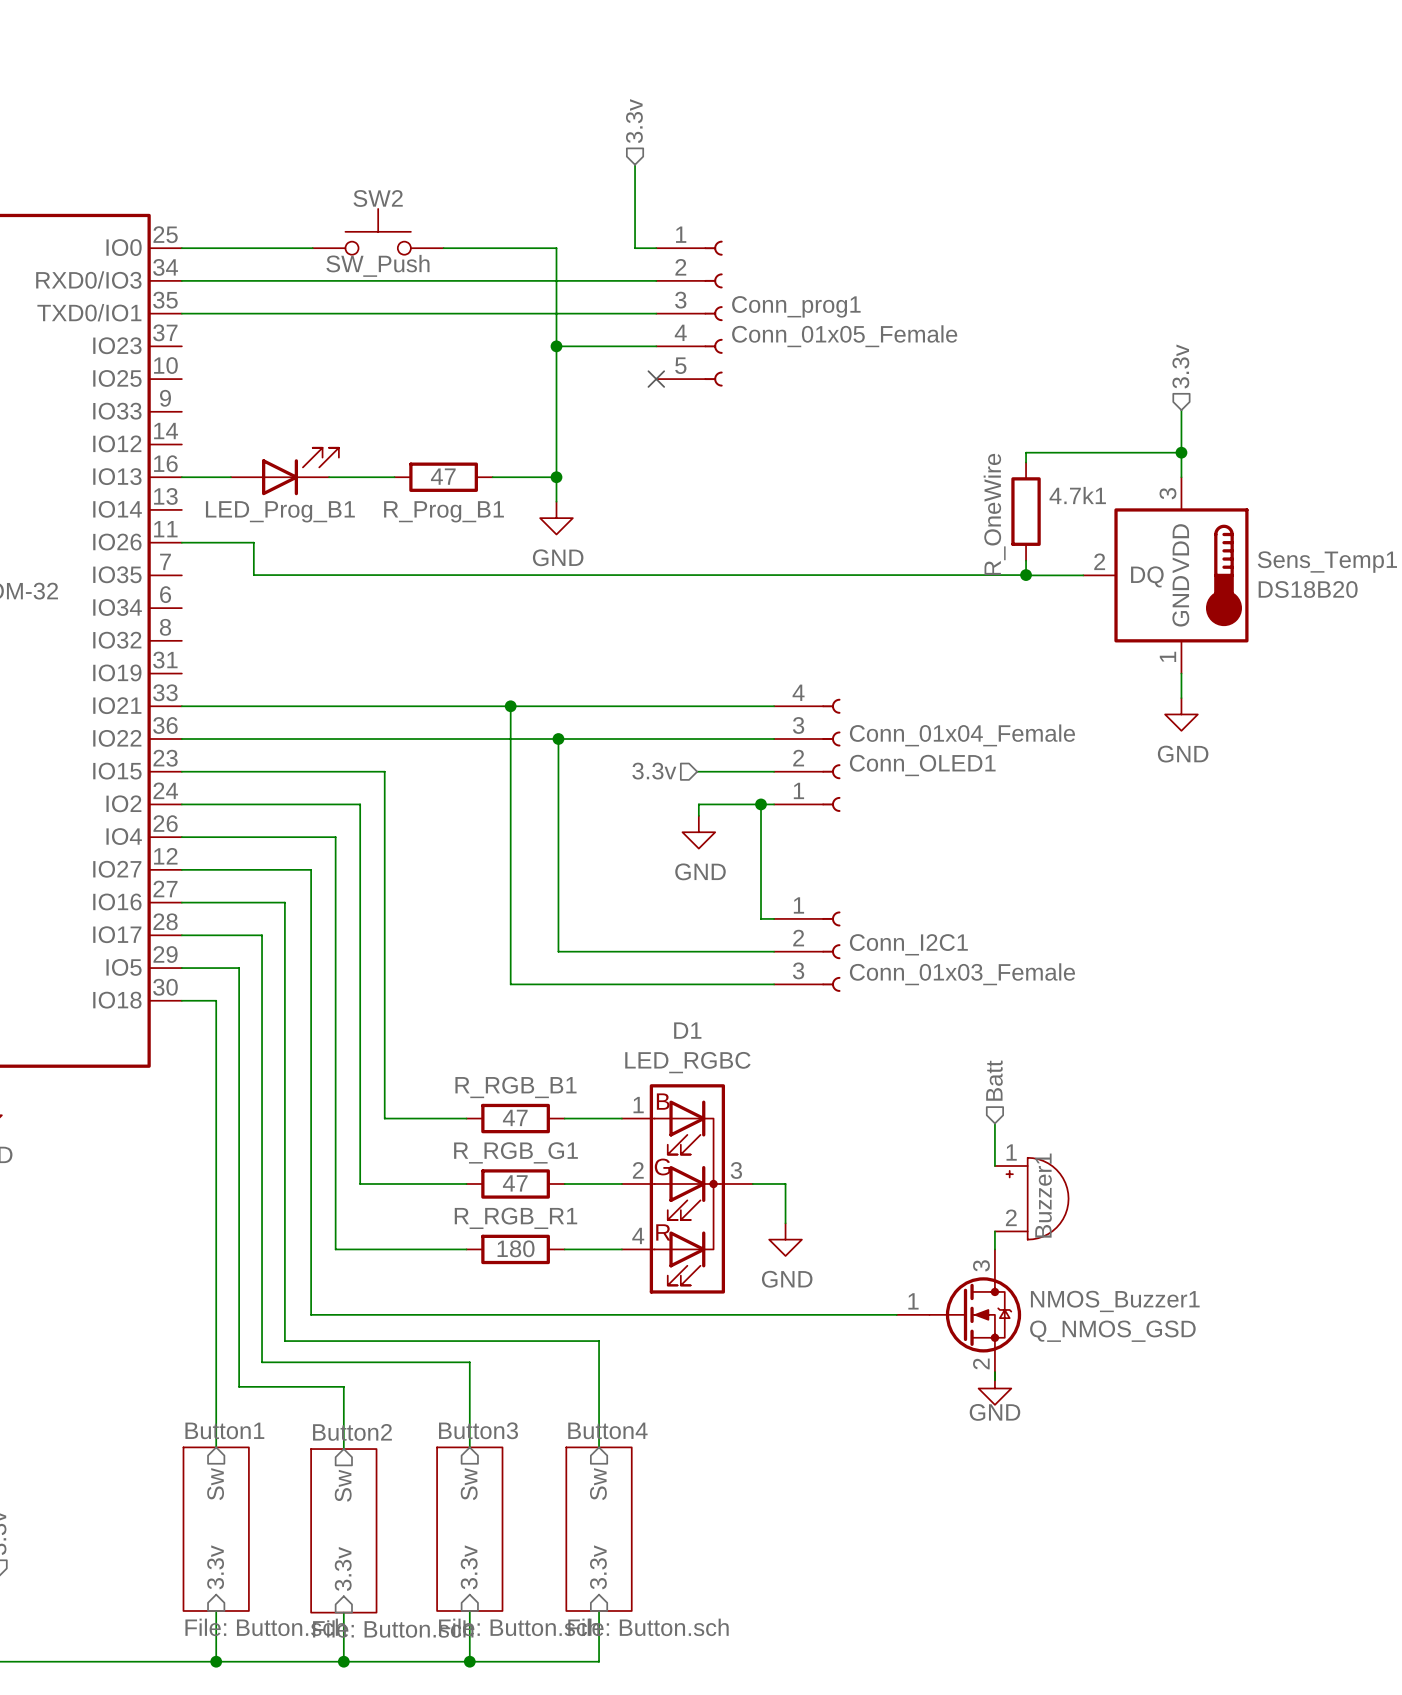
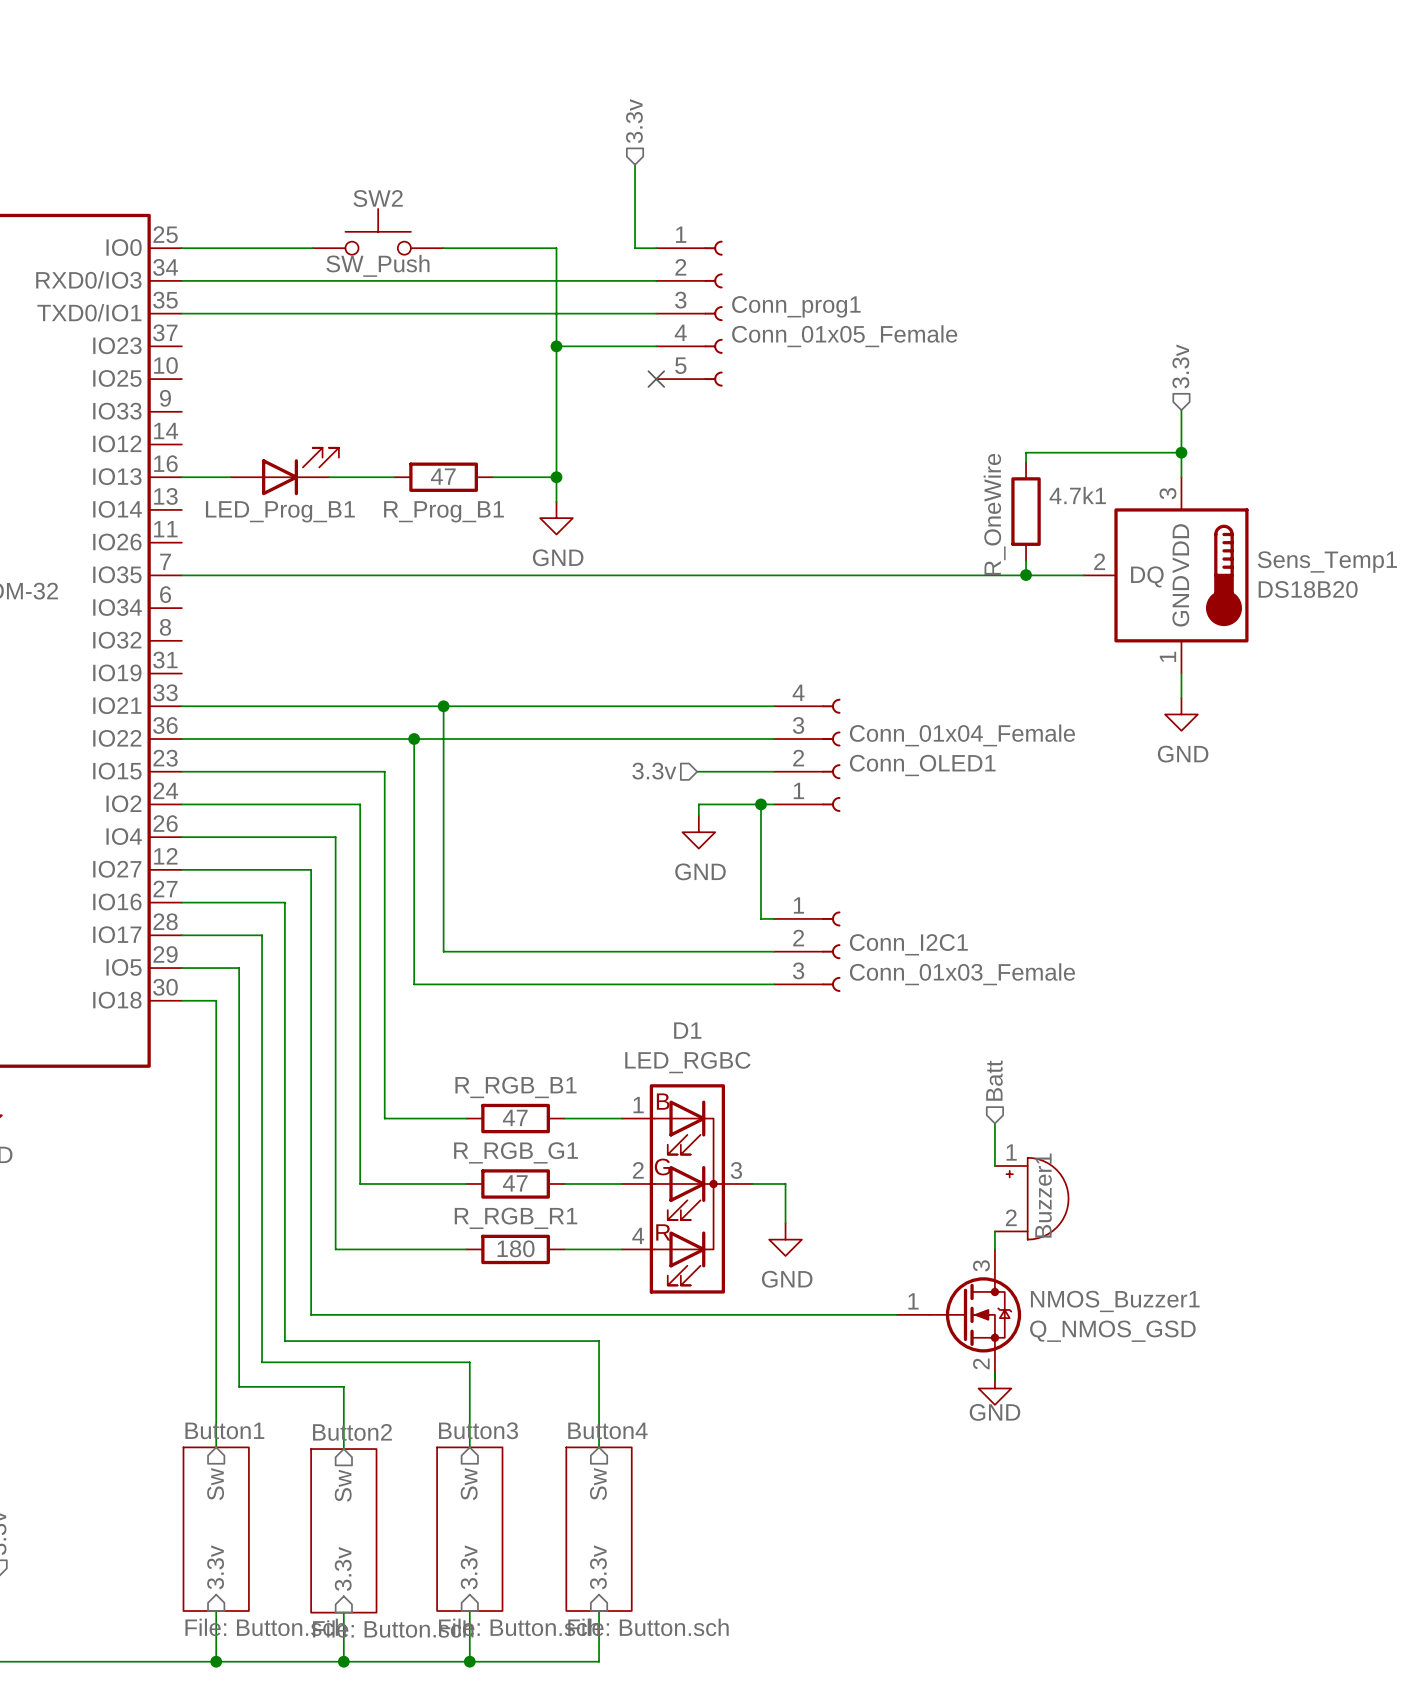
wire: (181, 542) (253, 542) (253, 575) (1026, 575) -> (181, 575) (1026, 575)
junction: none -> (443, 706)
wire: (510, 706) (510, 984) -> (414, 738) (414, 984) (510, 984)
junction: (510, 706) -> none
junction: none -> (414, 738)
wire: (558, 738) (558, 951) -> (443, 706) (443, 951) (558, 951)
junction: (558, 738) -> none

